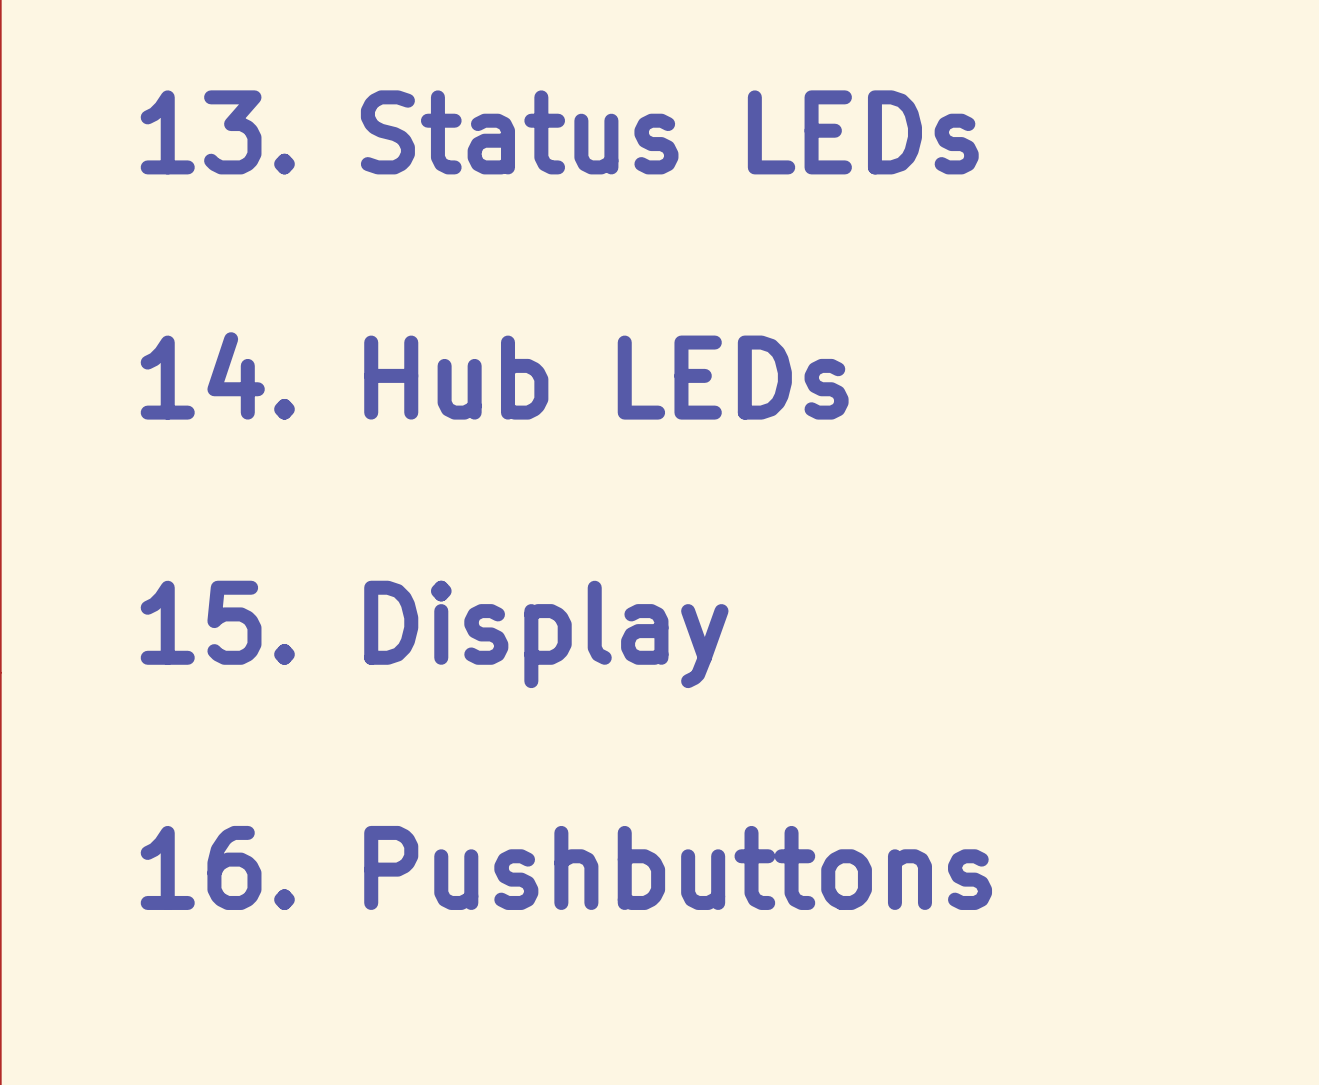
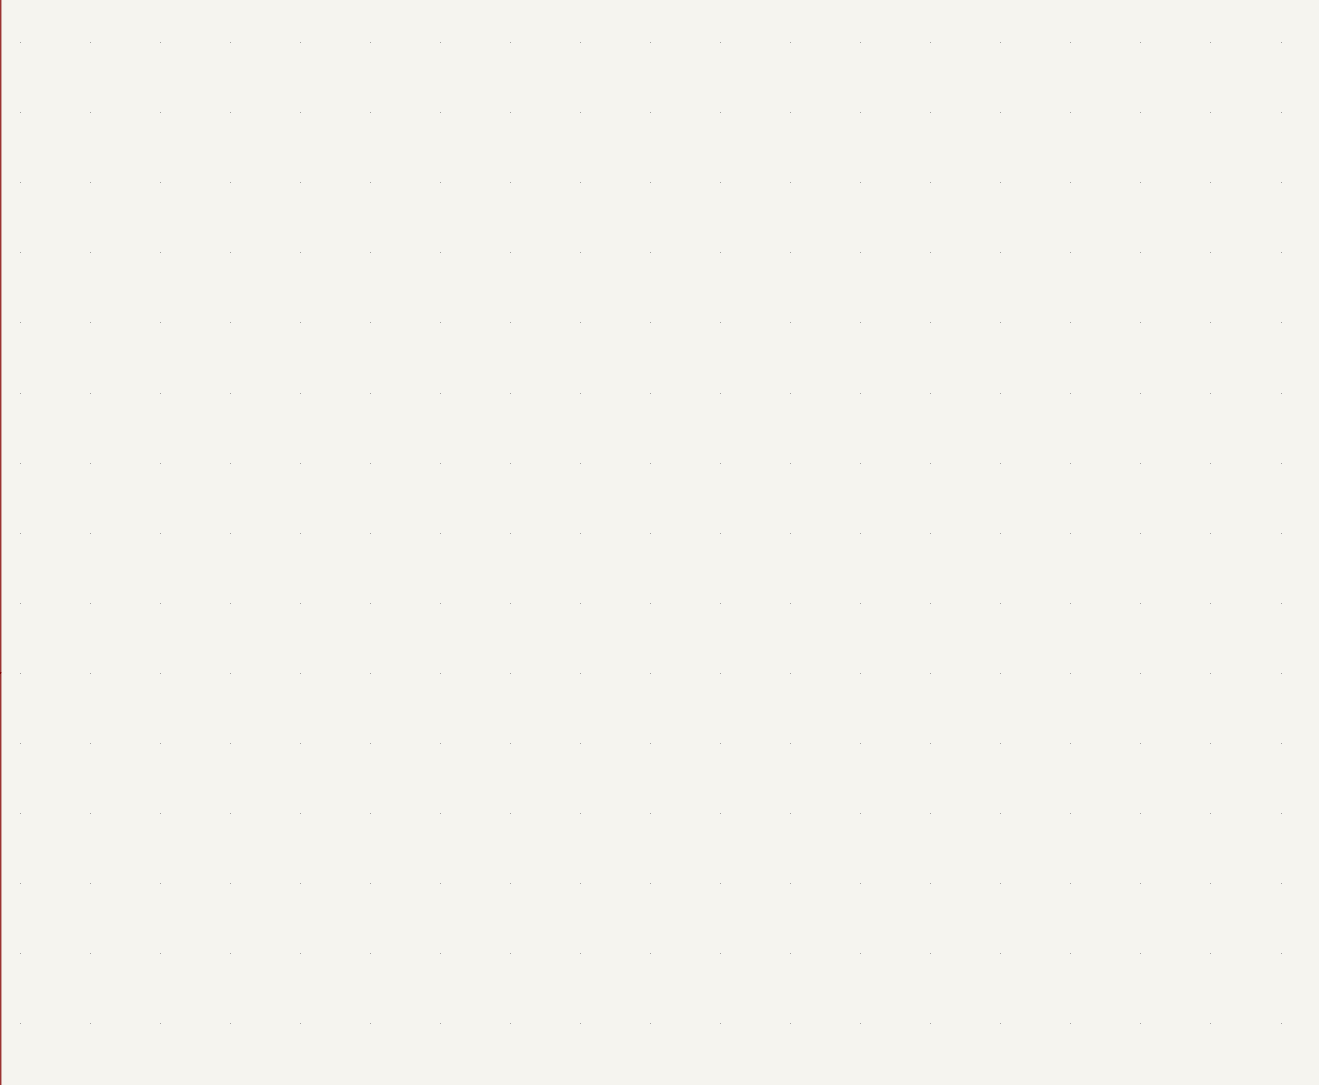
text: 13. Status LEDs (559, 132) -> none
text: 14. Hub LEDs (494, 375) -> none
text: 15. Display (434, 634) -> none
text: 16. Pushbuttons (566, 867) -> none

